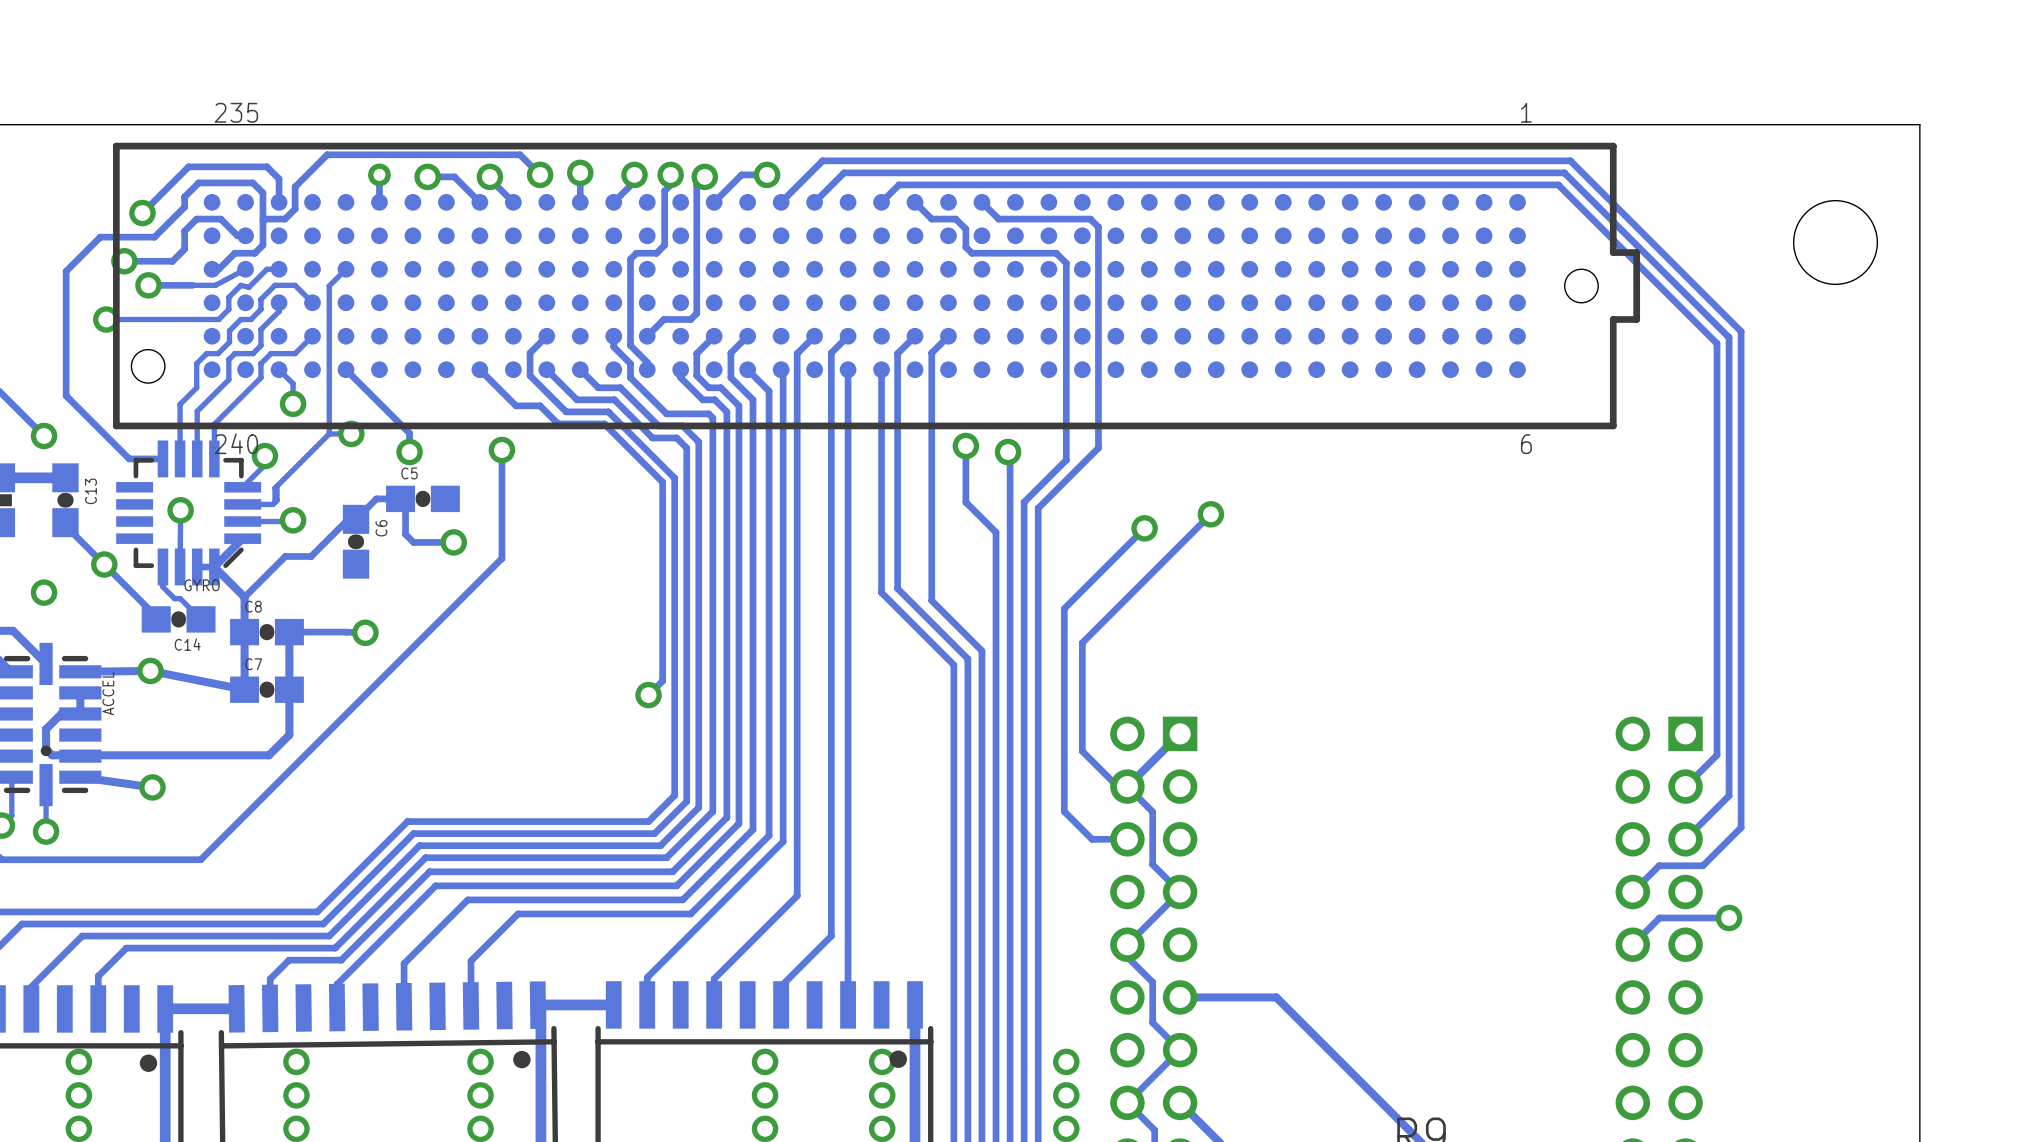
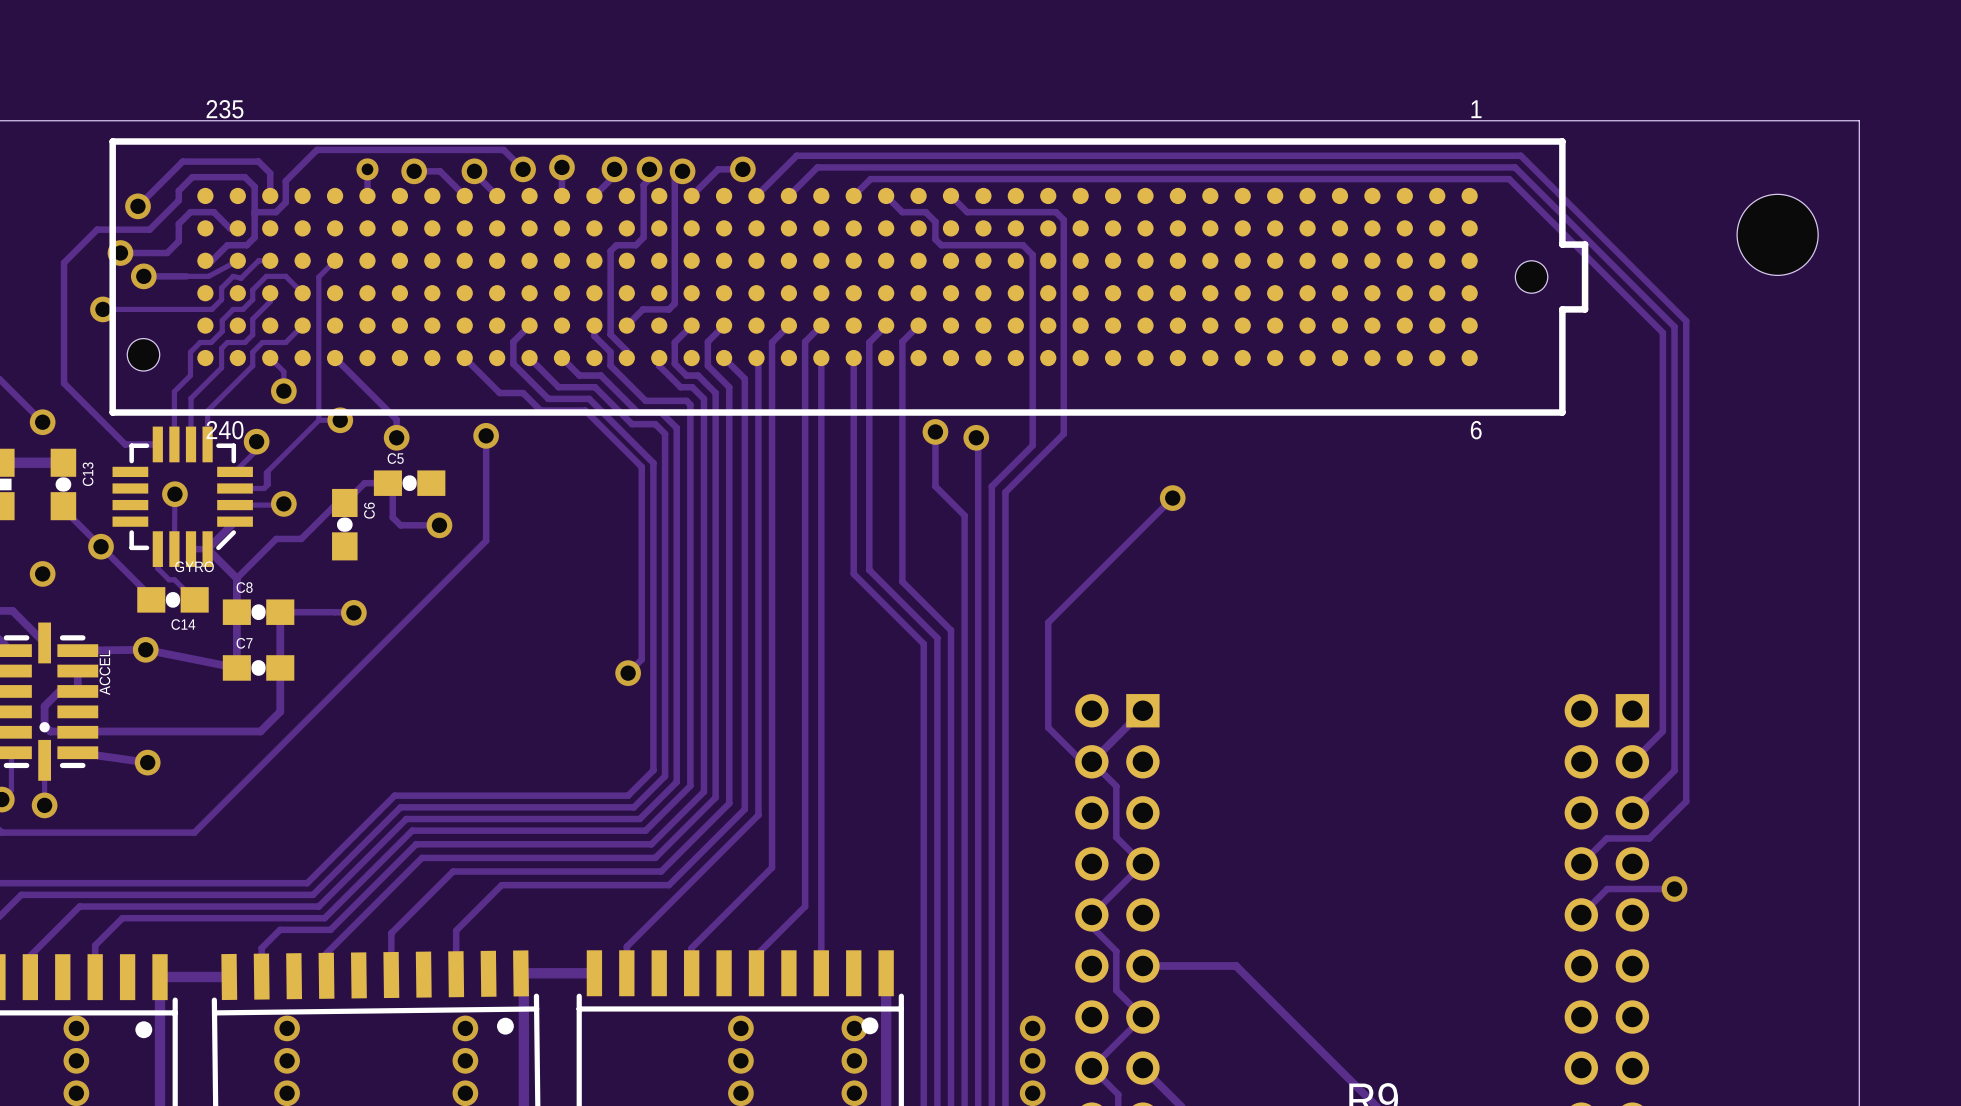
track: (1144, 528) (1064, 608) (1064, 811) (1092, 839) (1127, 839) -> none
via: (1144, 528) -> none

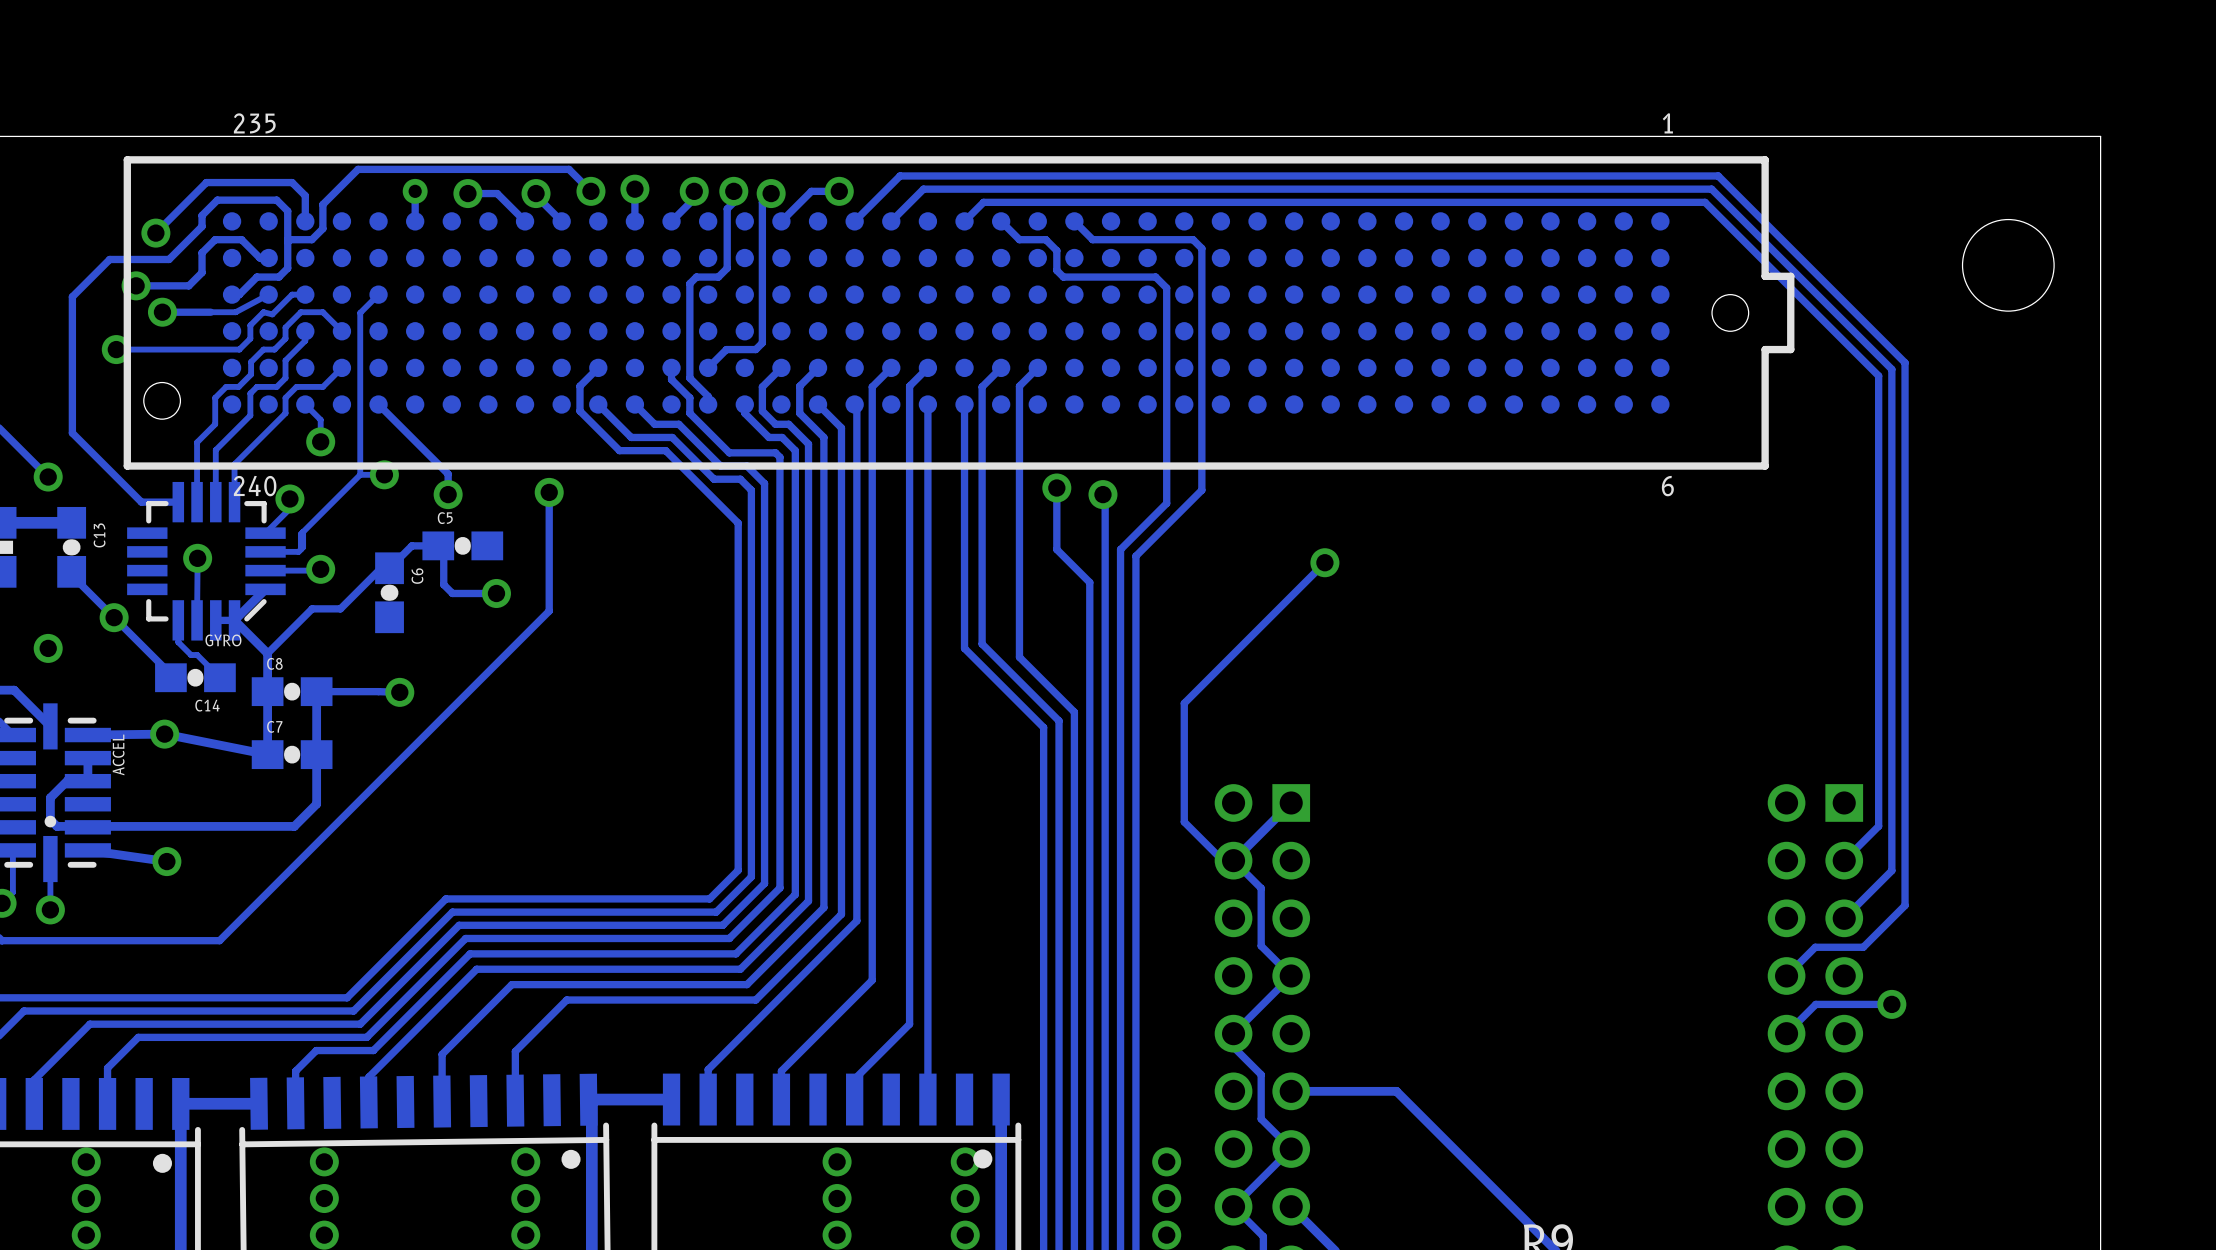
track: (464, 358) (499, 393) (523, 393) (540, 410) (585, 410) (641, 466) (641, 659) (628, 673) -> none
via: (628, 673) -> none

